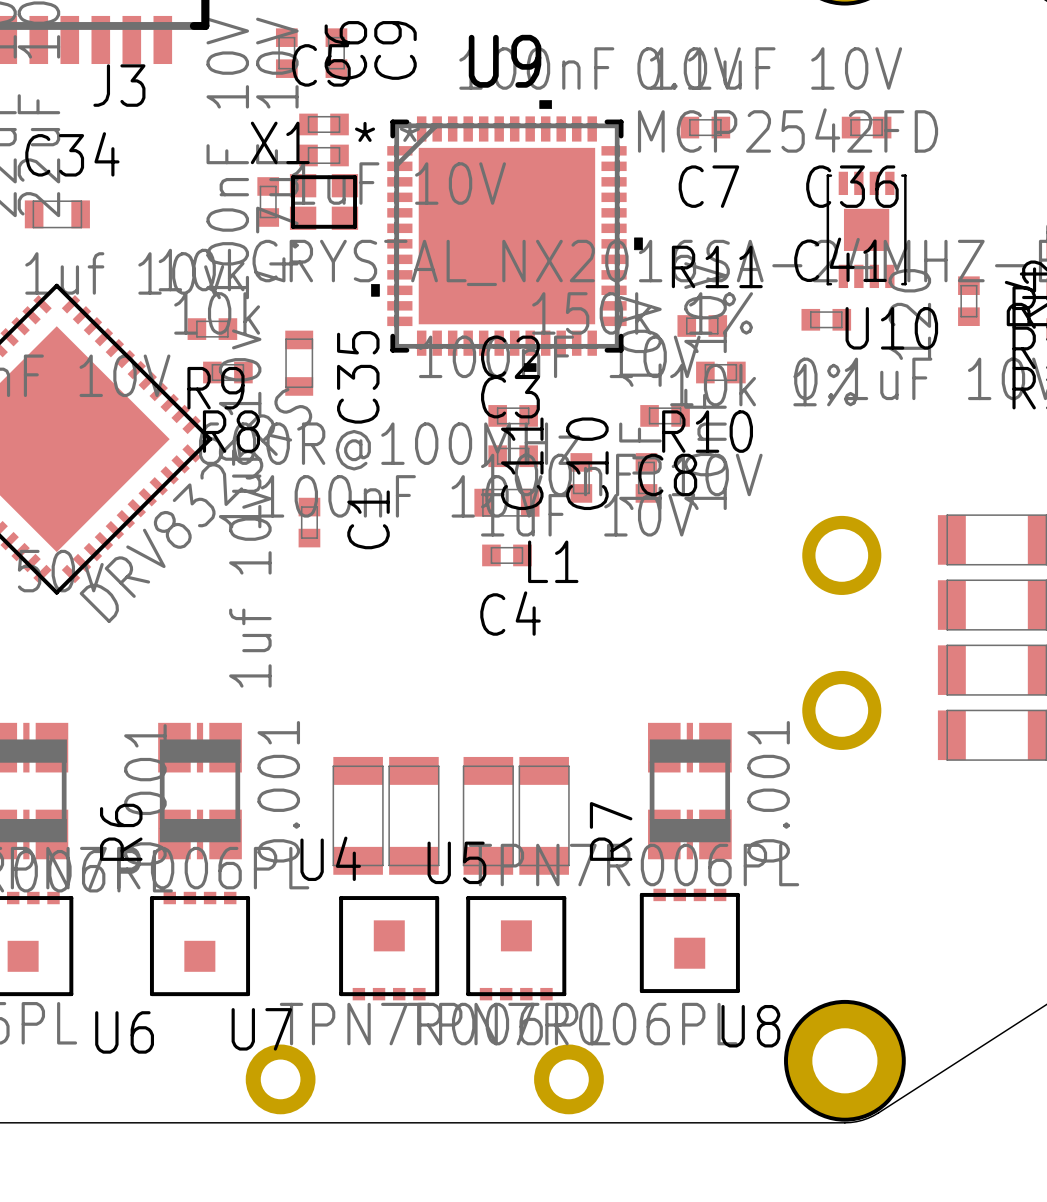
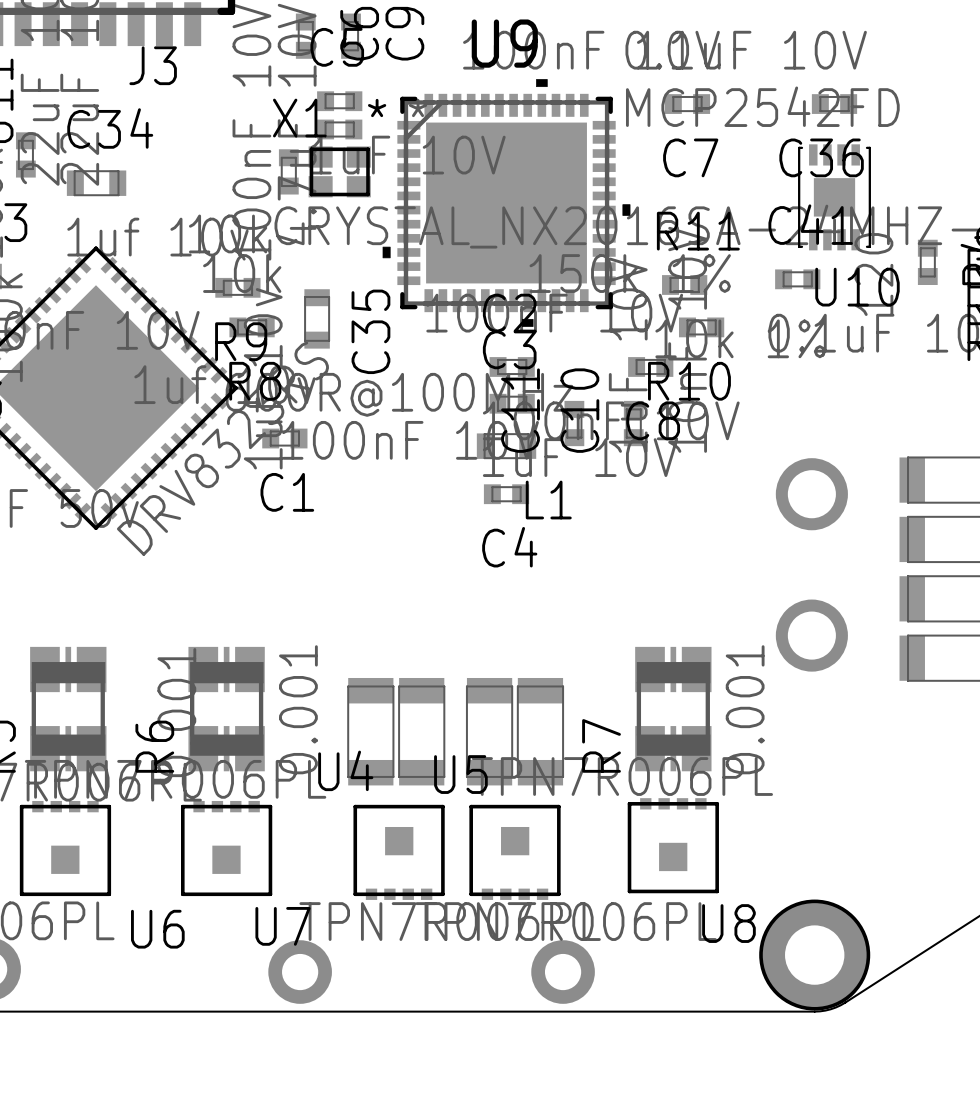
C1 rotation: 0° (309, 522) -> 90° clockwise (284, 438)
C1 position: (309, 522) -> (284, 438)

